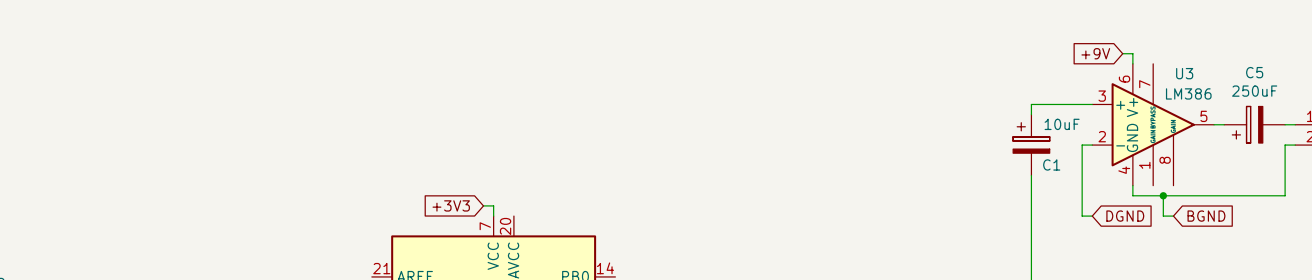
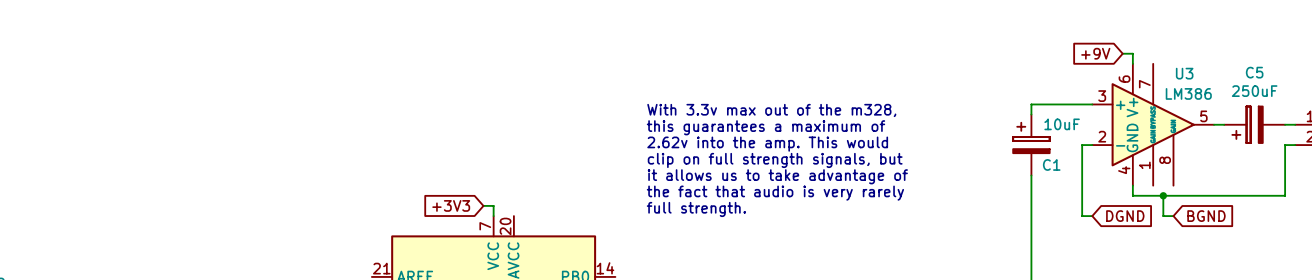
text: none -> With 3.3v max out of the m328, (771, 110)
text: none -> this guarantees a maximum of (765, 127)
text: none -> 2.62v into the amp. This would (767, 144)
text: none -> clip on full strength signals, but (775, 160)
text: none -> it allows us to take advantage of (777, 176)
text: none -> the fact that audio is very rarely (775, 193)
text: none -> full strength. (696, 209)

